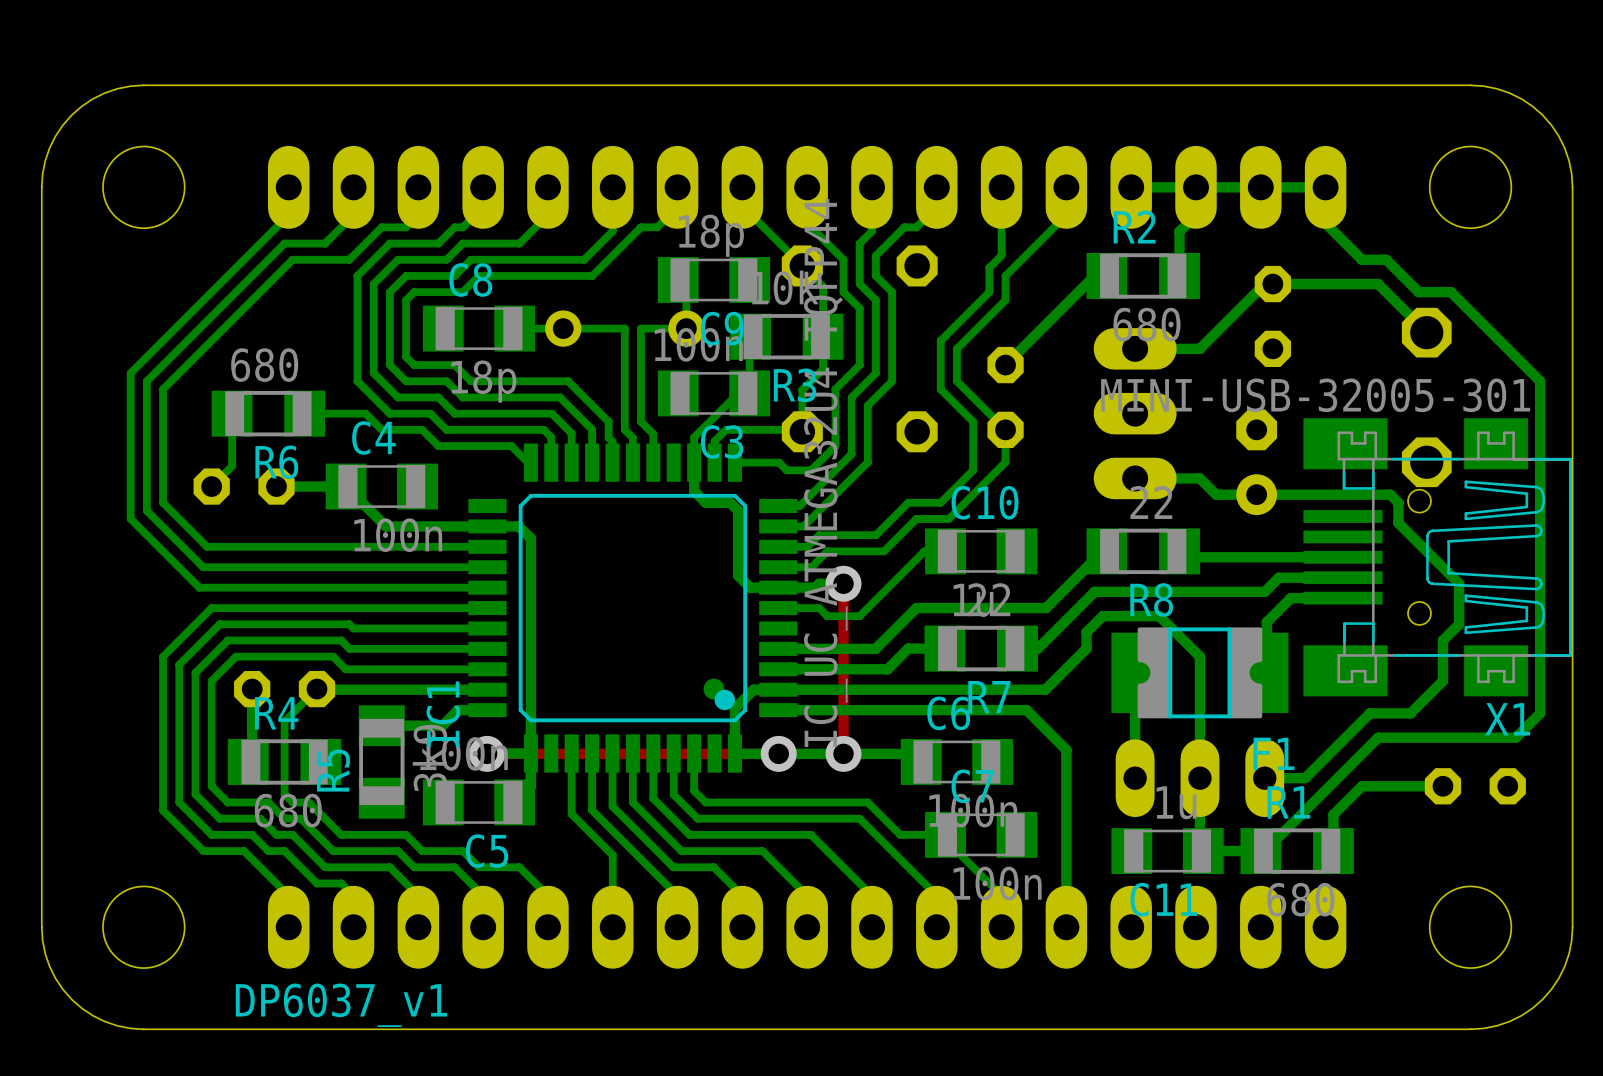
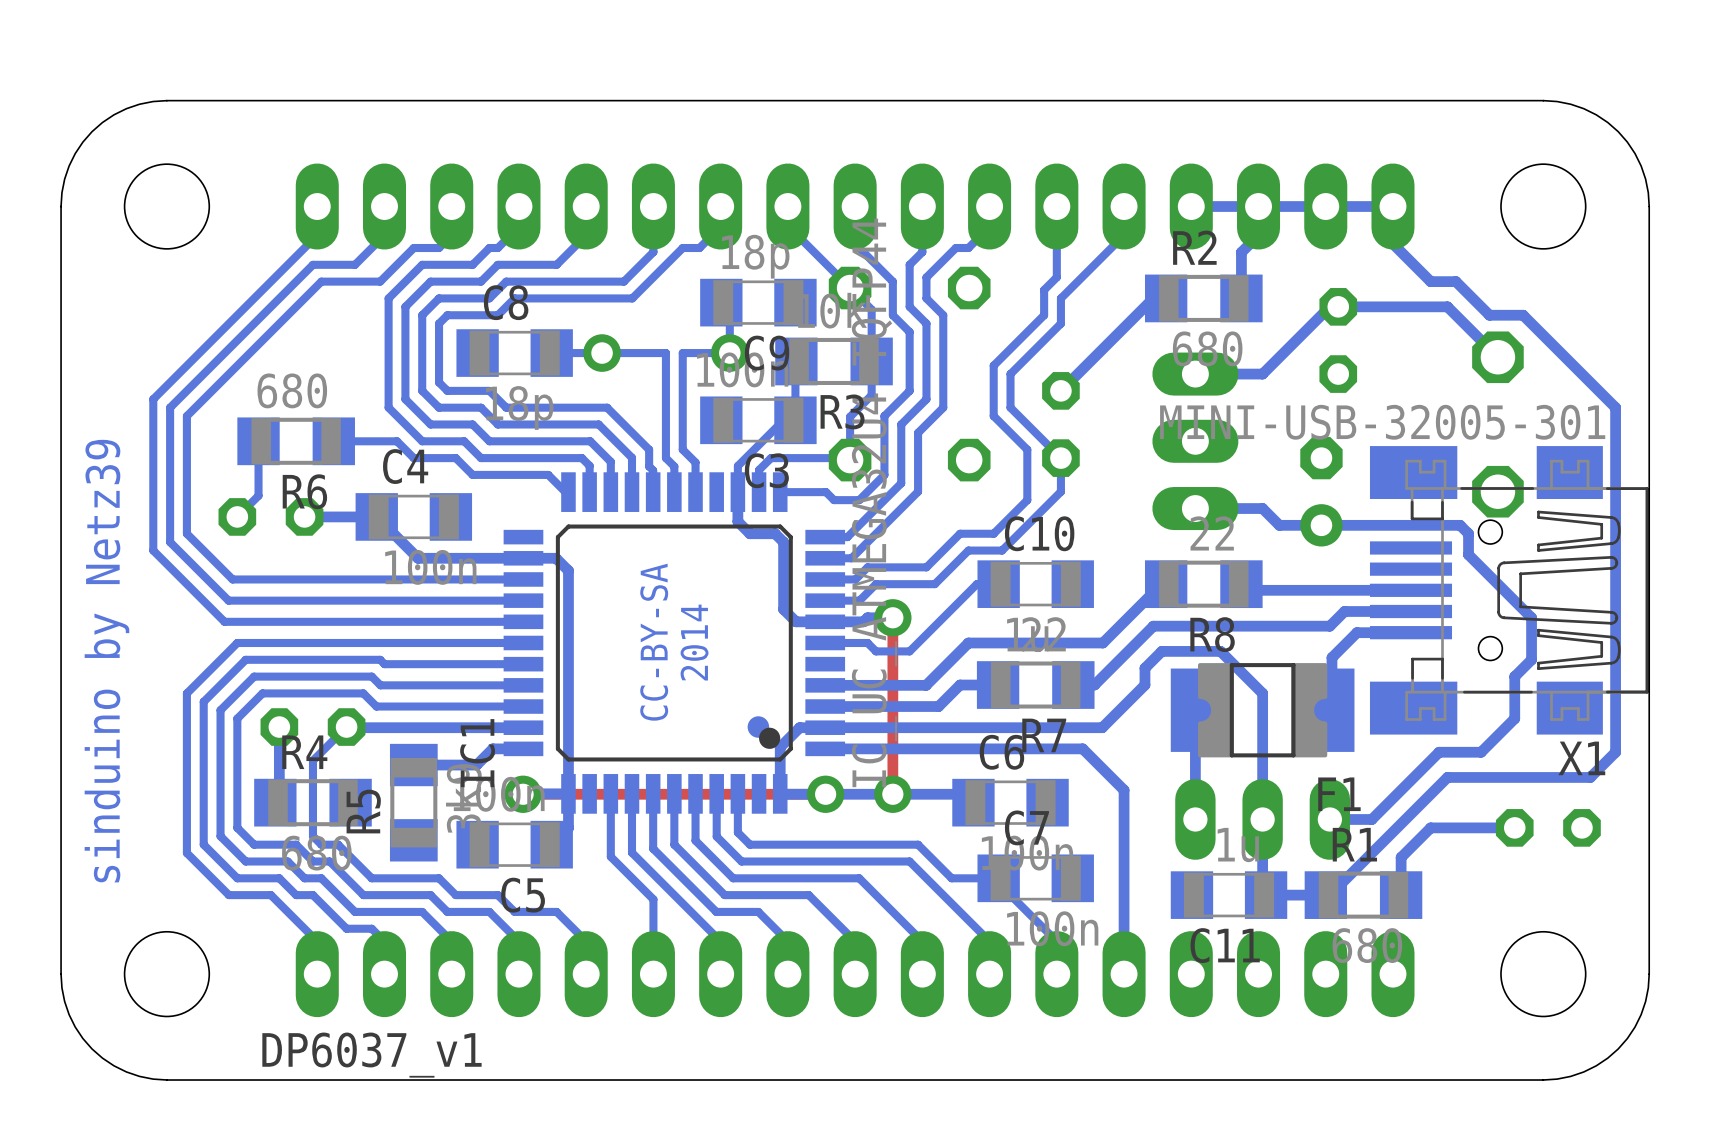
text: none -> CC-BY-SA (654, 642)
text: none -> 2014 (694, 642)
text: none -> sinduino by Netz39 (106, 661)

